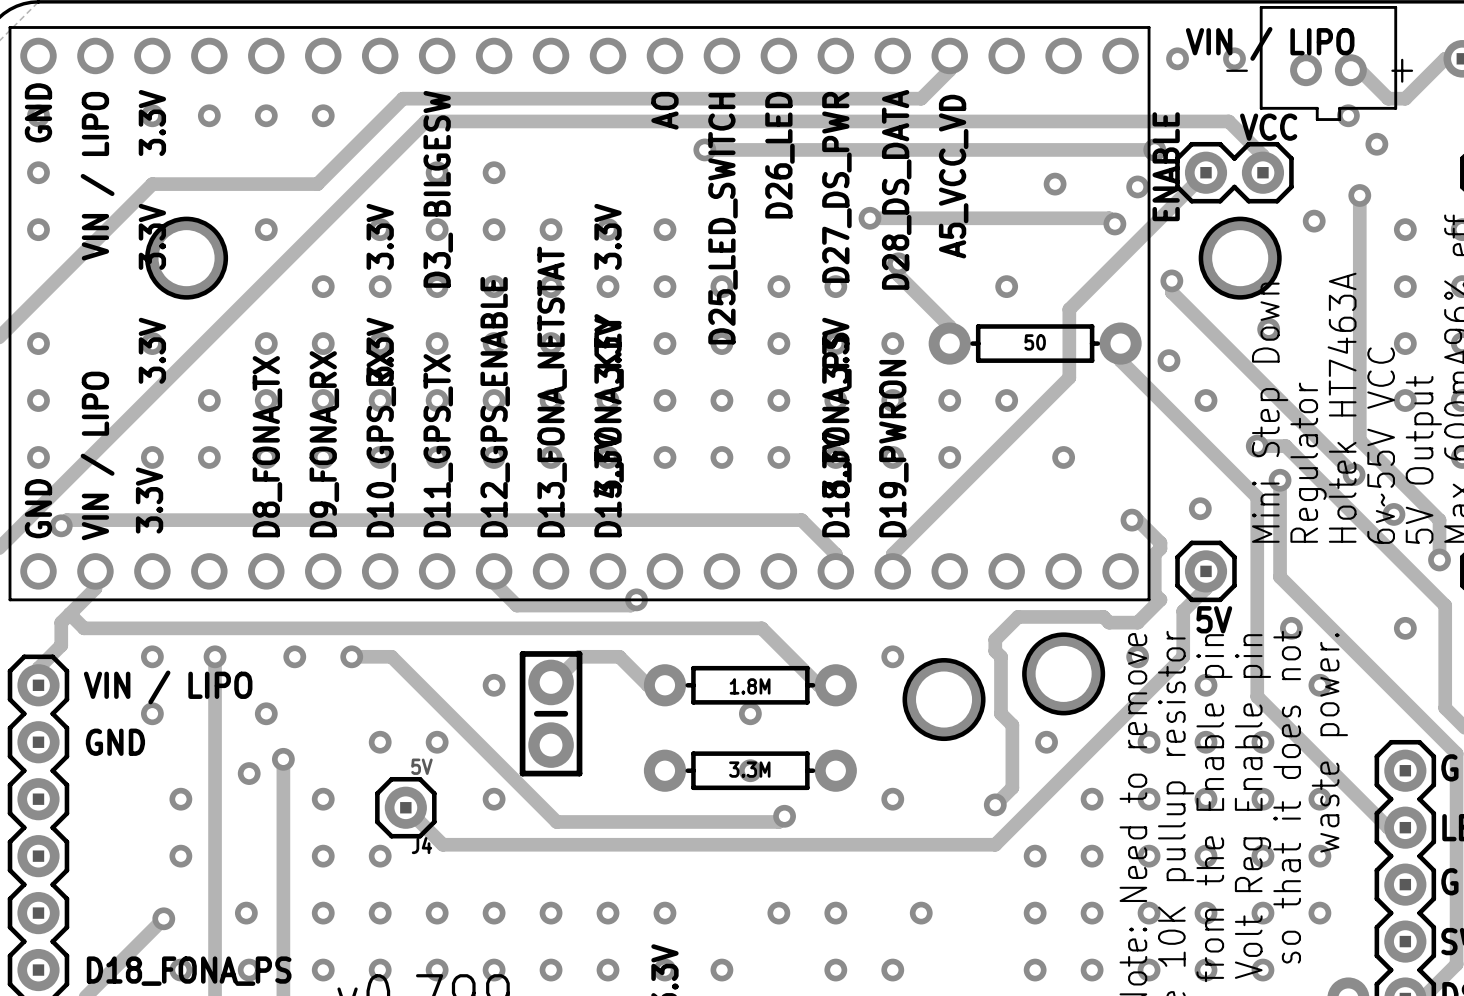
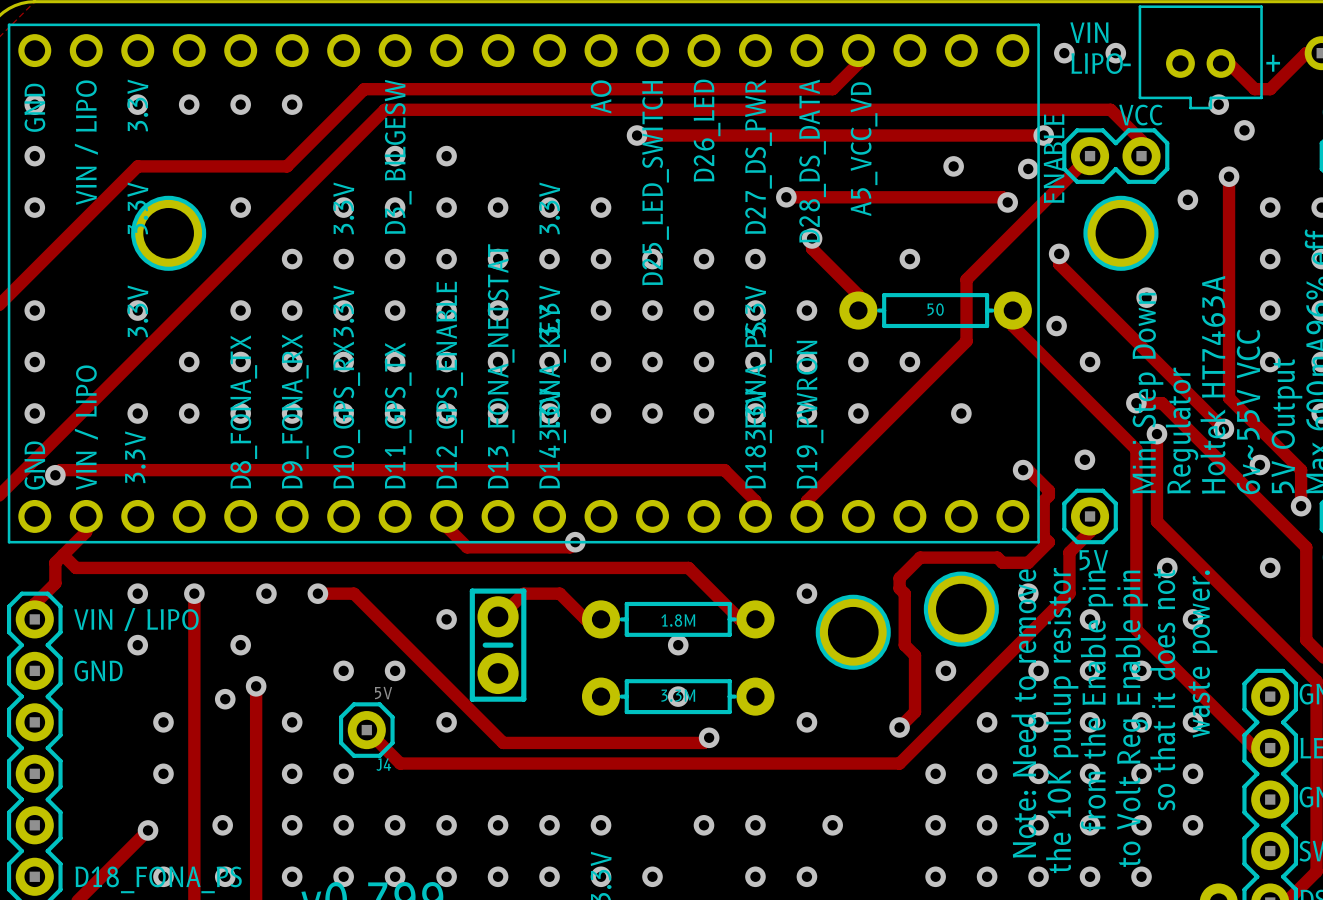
text: VIN / LIPO (1270, 43) -> VIN (1089, 32)
text: none -> LIPO (1097, 63)

